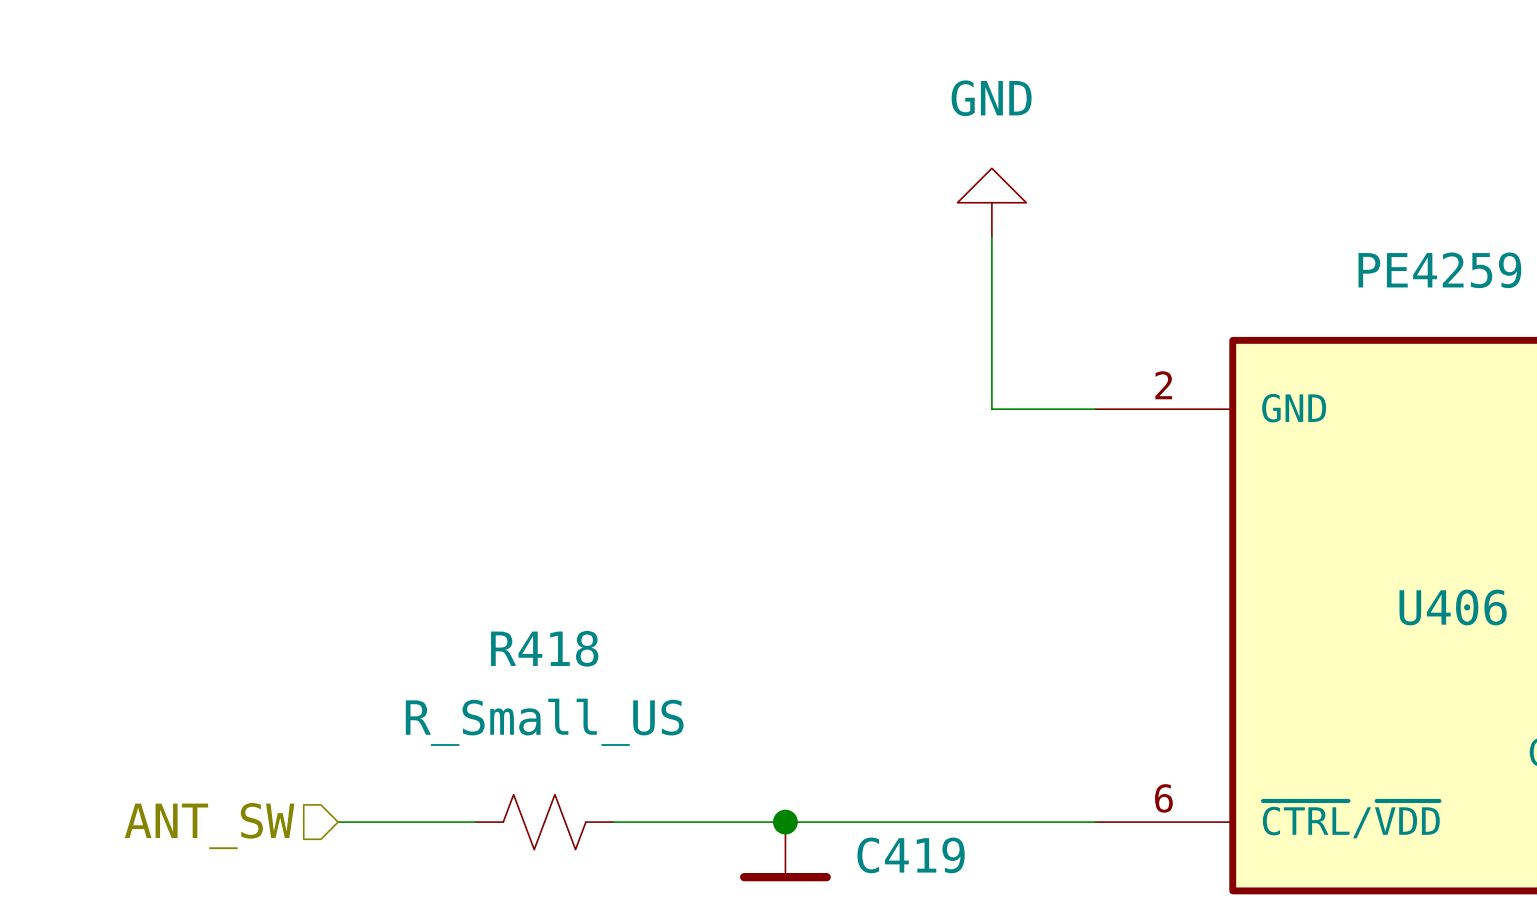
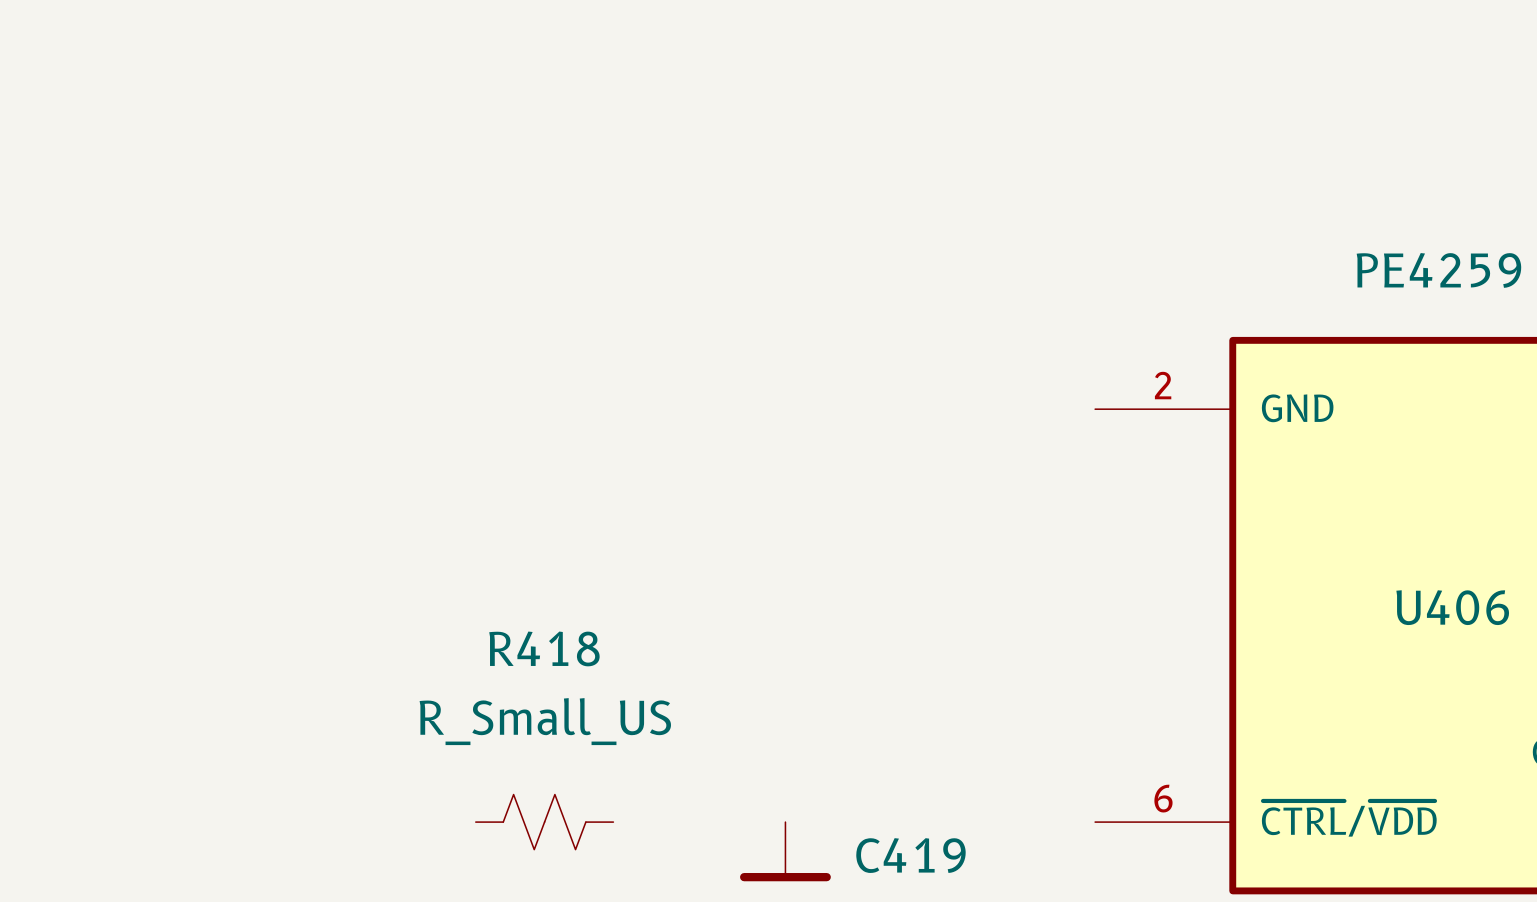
power symbol: GND (991, 202) -> none
wire: (991, 237) (991, 409) (1095, 409) -> none
wire: (338, 822) (475, 822) -> none
wire: (613, 822) (1095, 822) -> none
junction: (785, 822) -> none
hierarchical label: ANT_SW (209, 826) -> none

